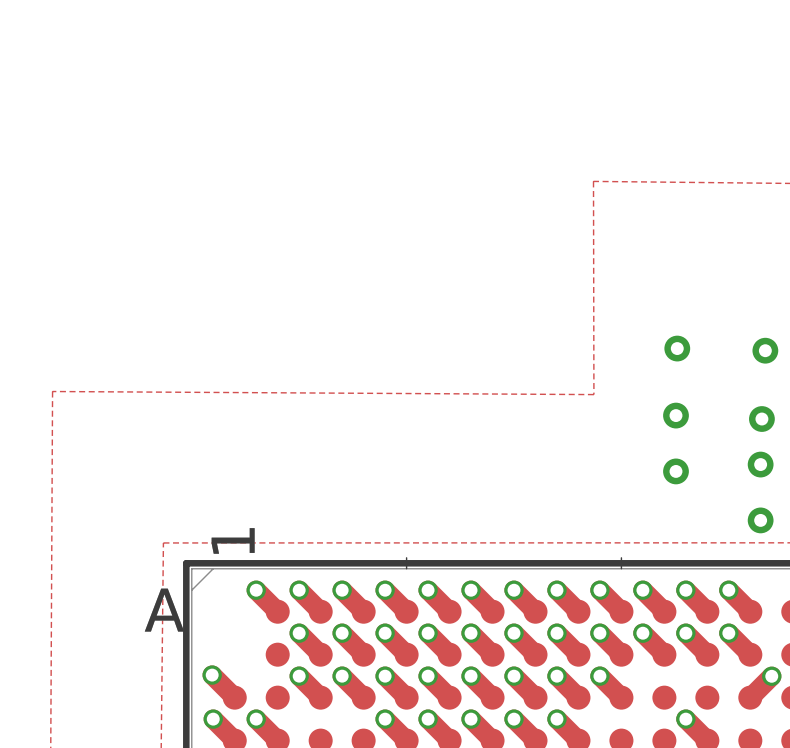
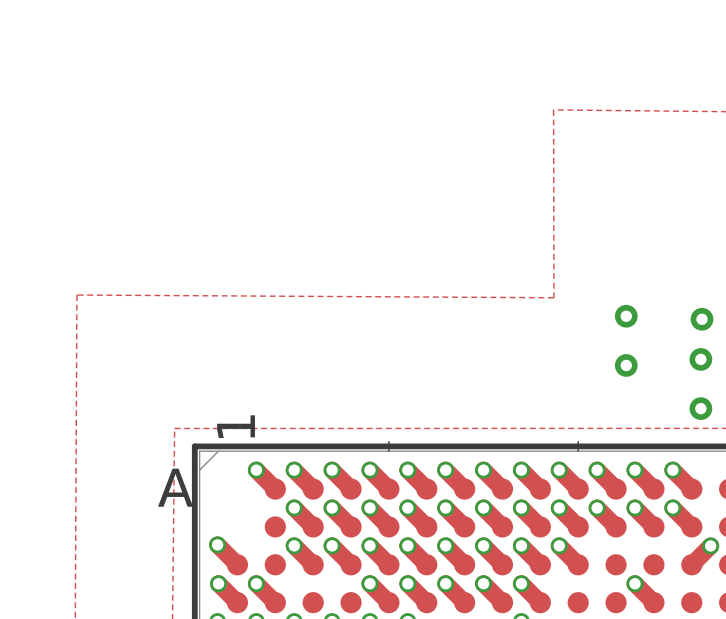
via: (677, 348) -> none
via: (765, 350) -> none

